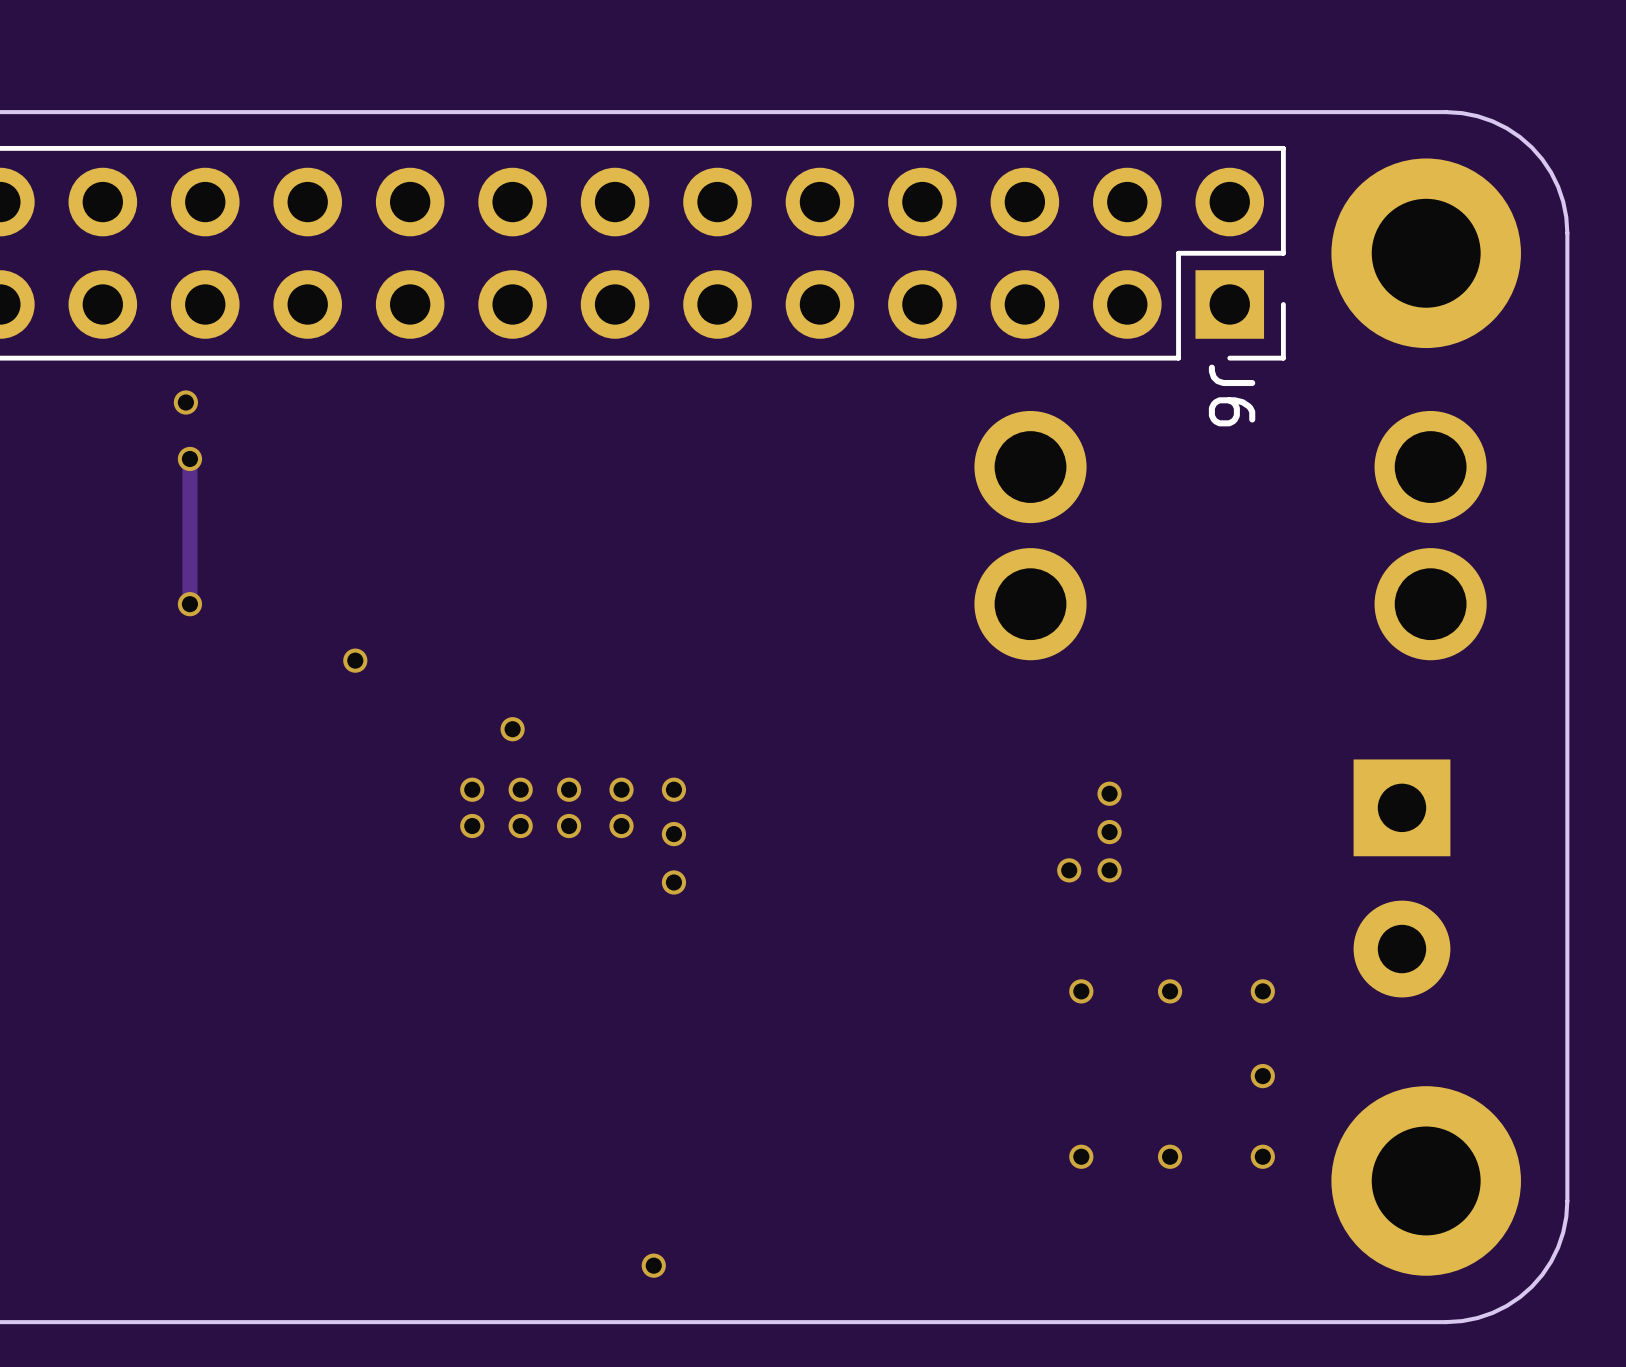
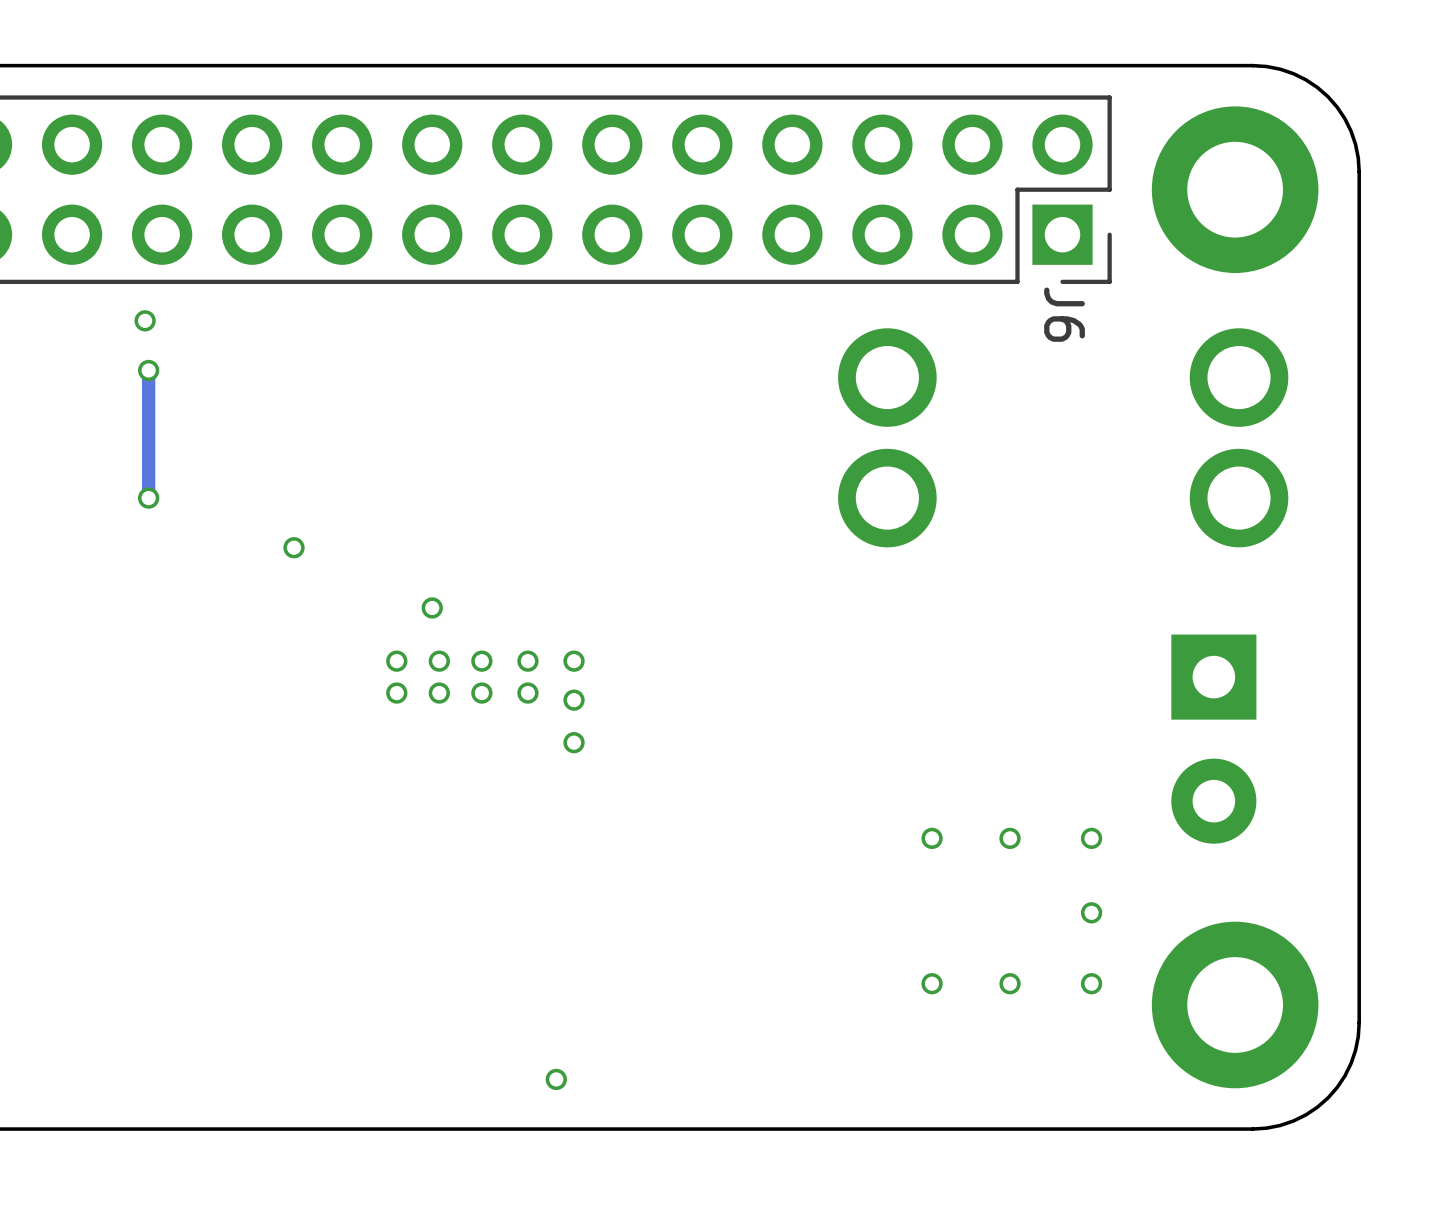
via: (1109, 793) -> none
via: (1109, 832) -> none
via: (1069, 870) -> none
via: (1109, 870) -> none

